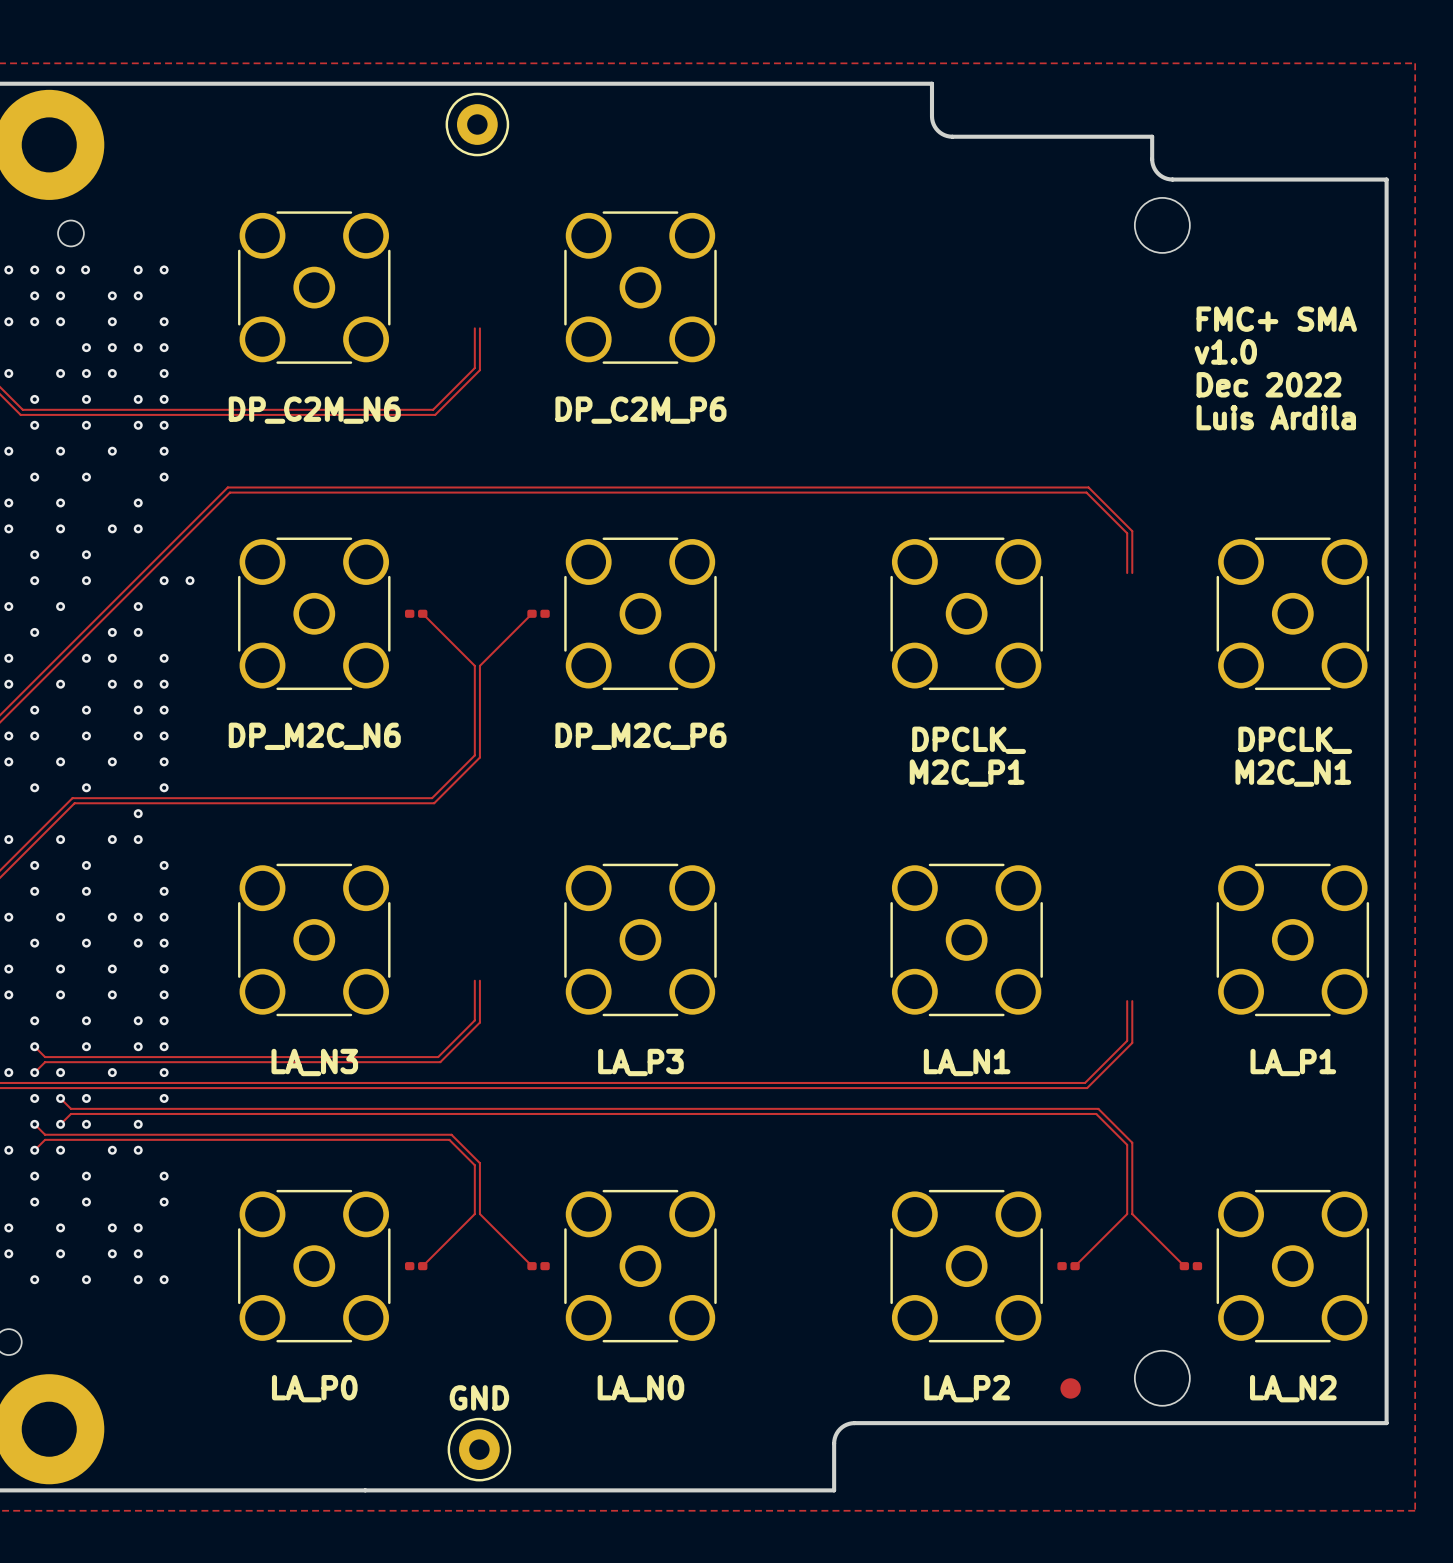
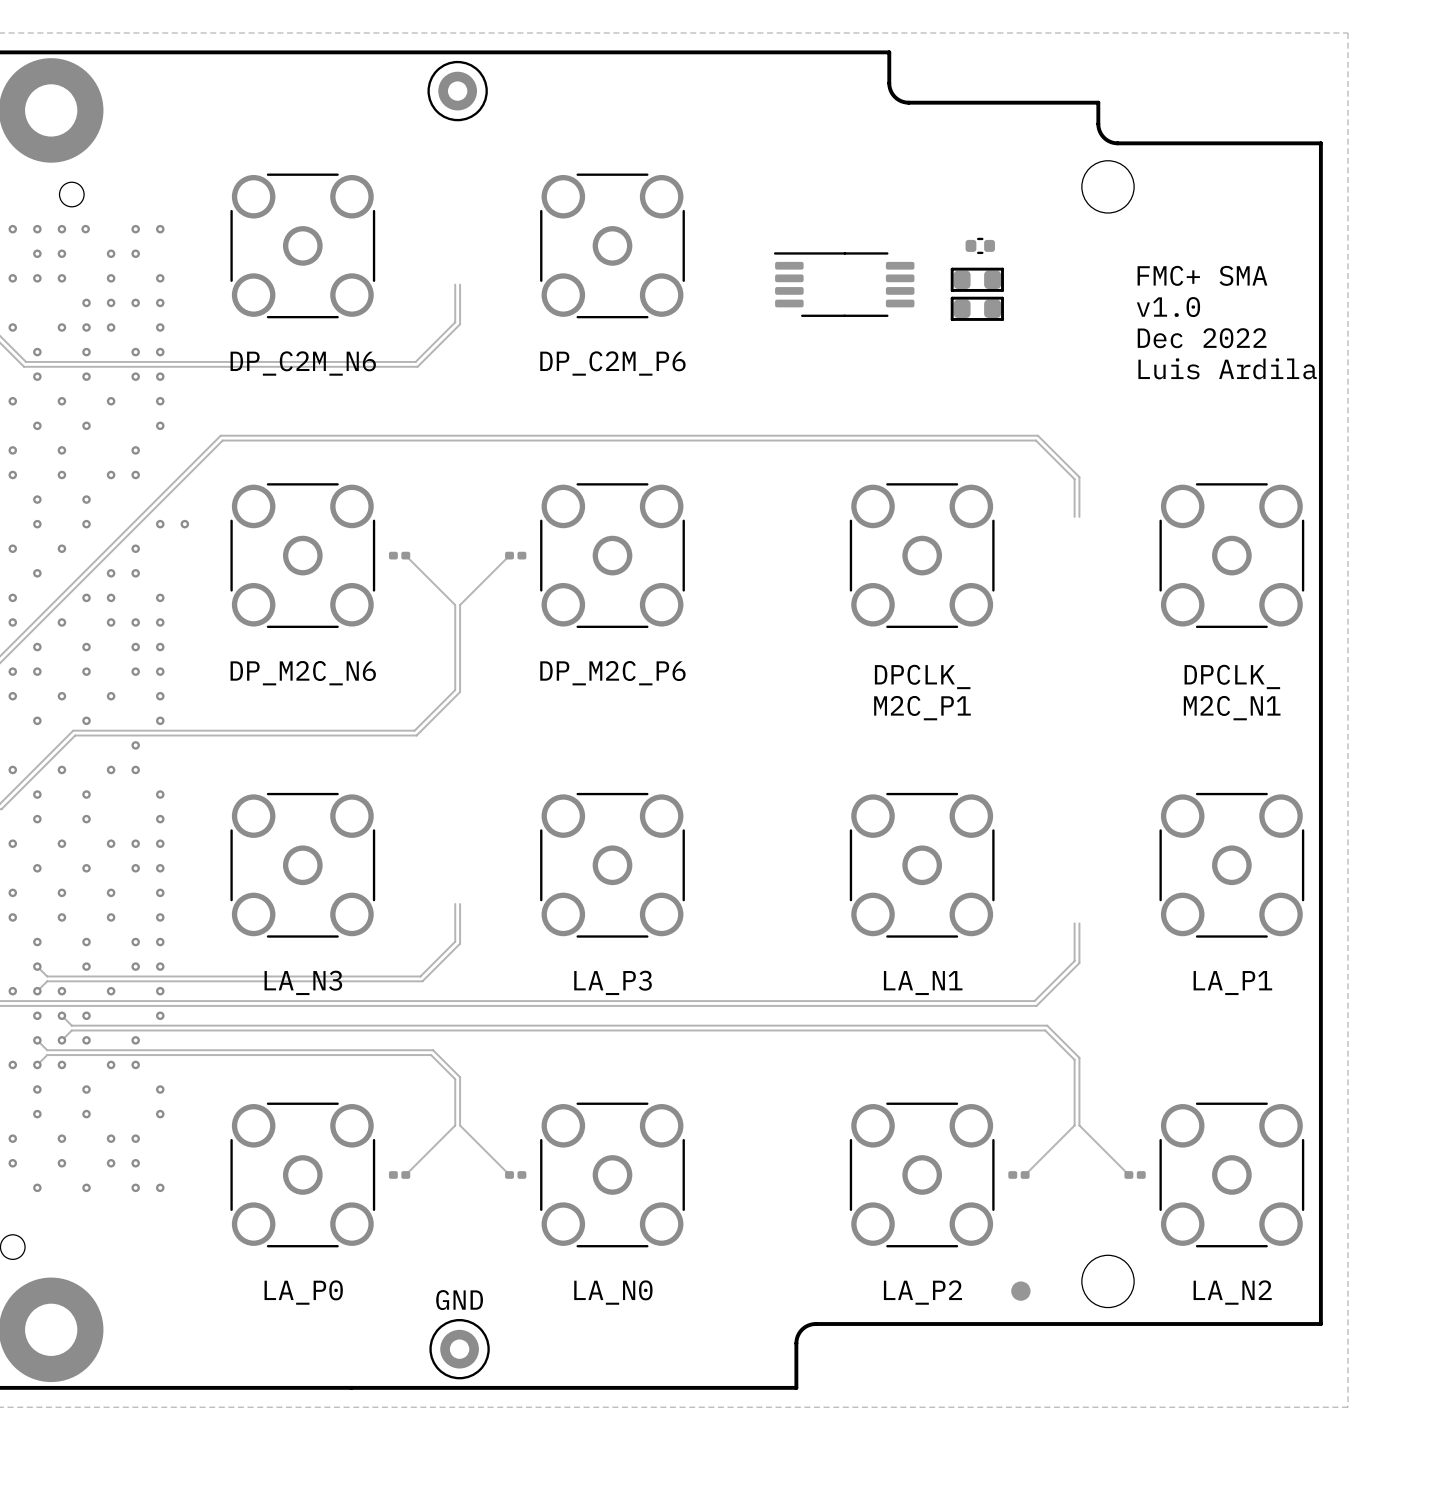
part: none -> (980, 245)
part: none -> (977, 279)
part: none -> (844, 284)
part: none -> (977, 308)

